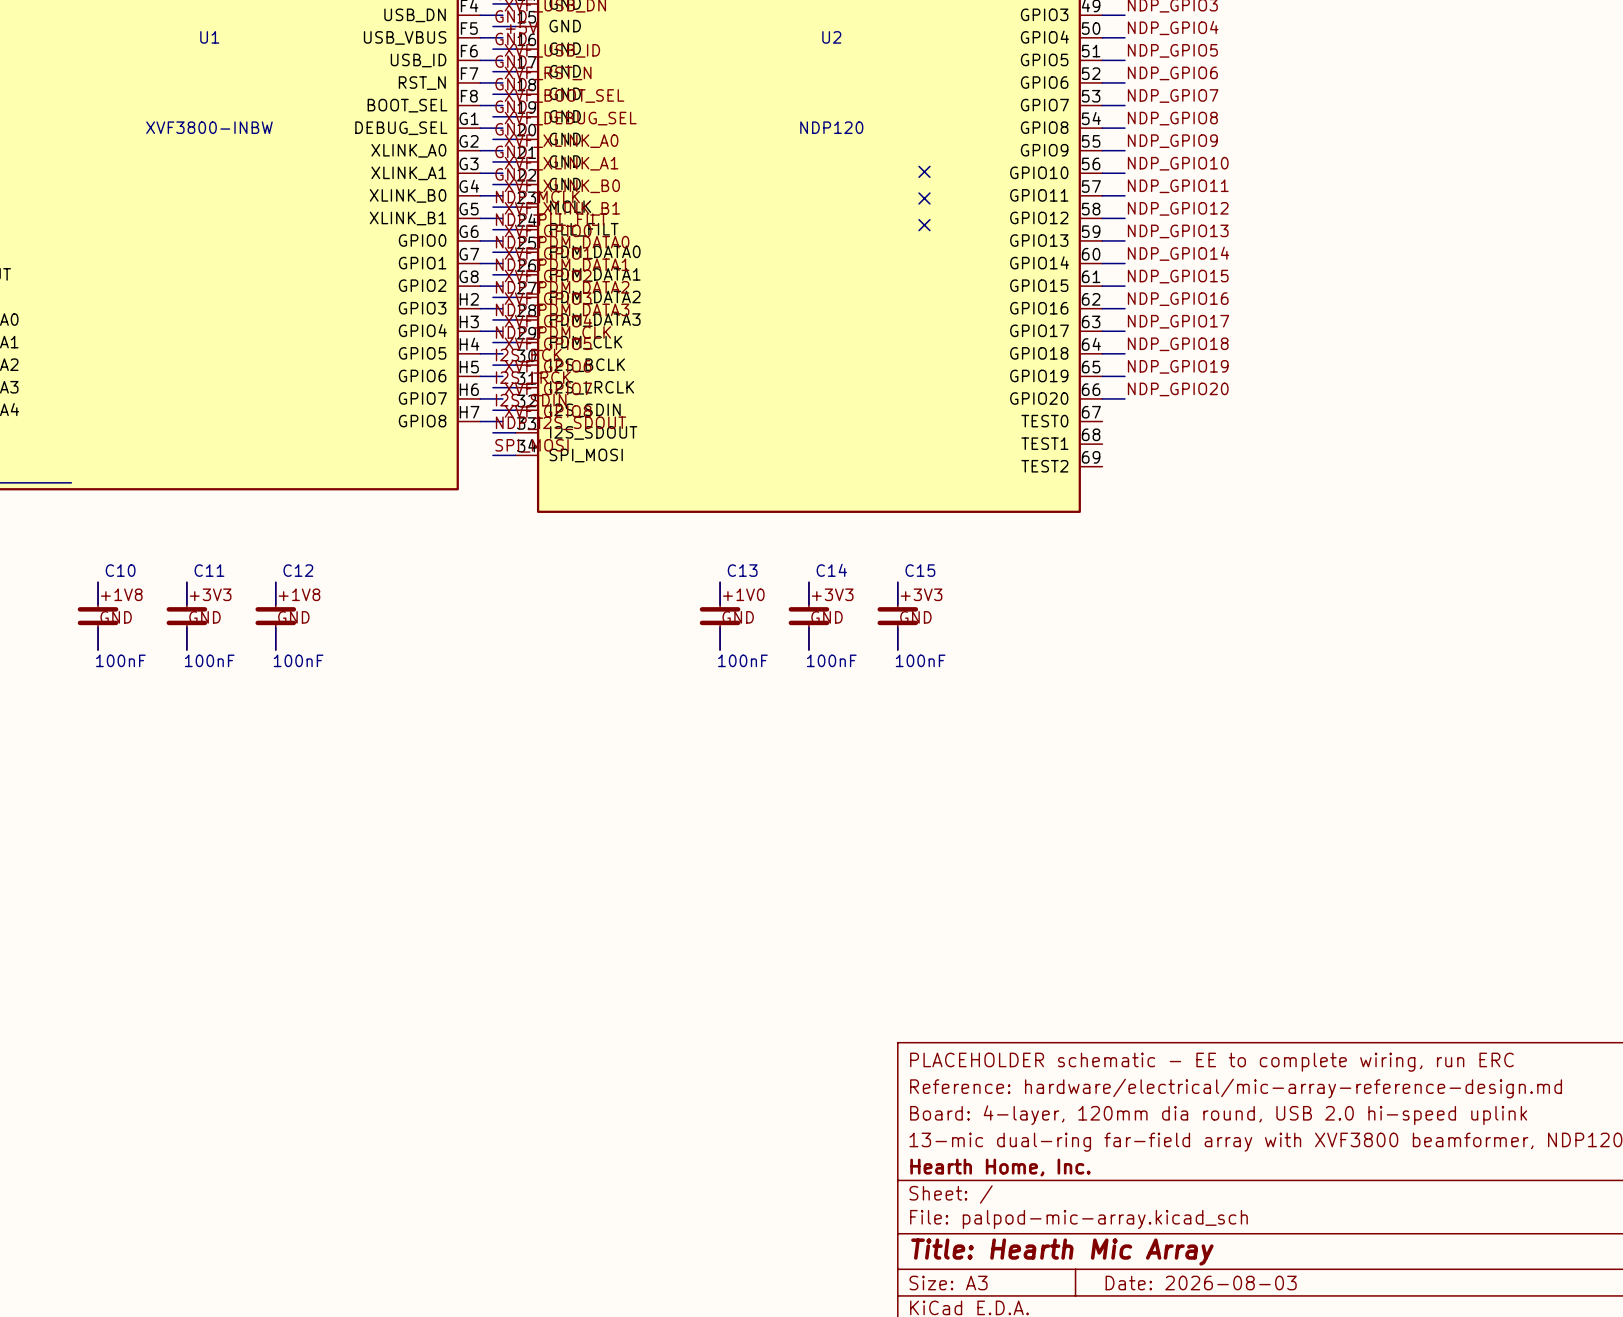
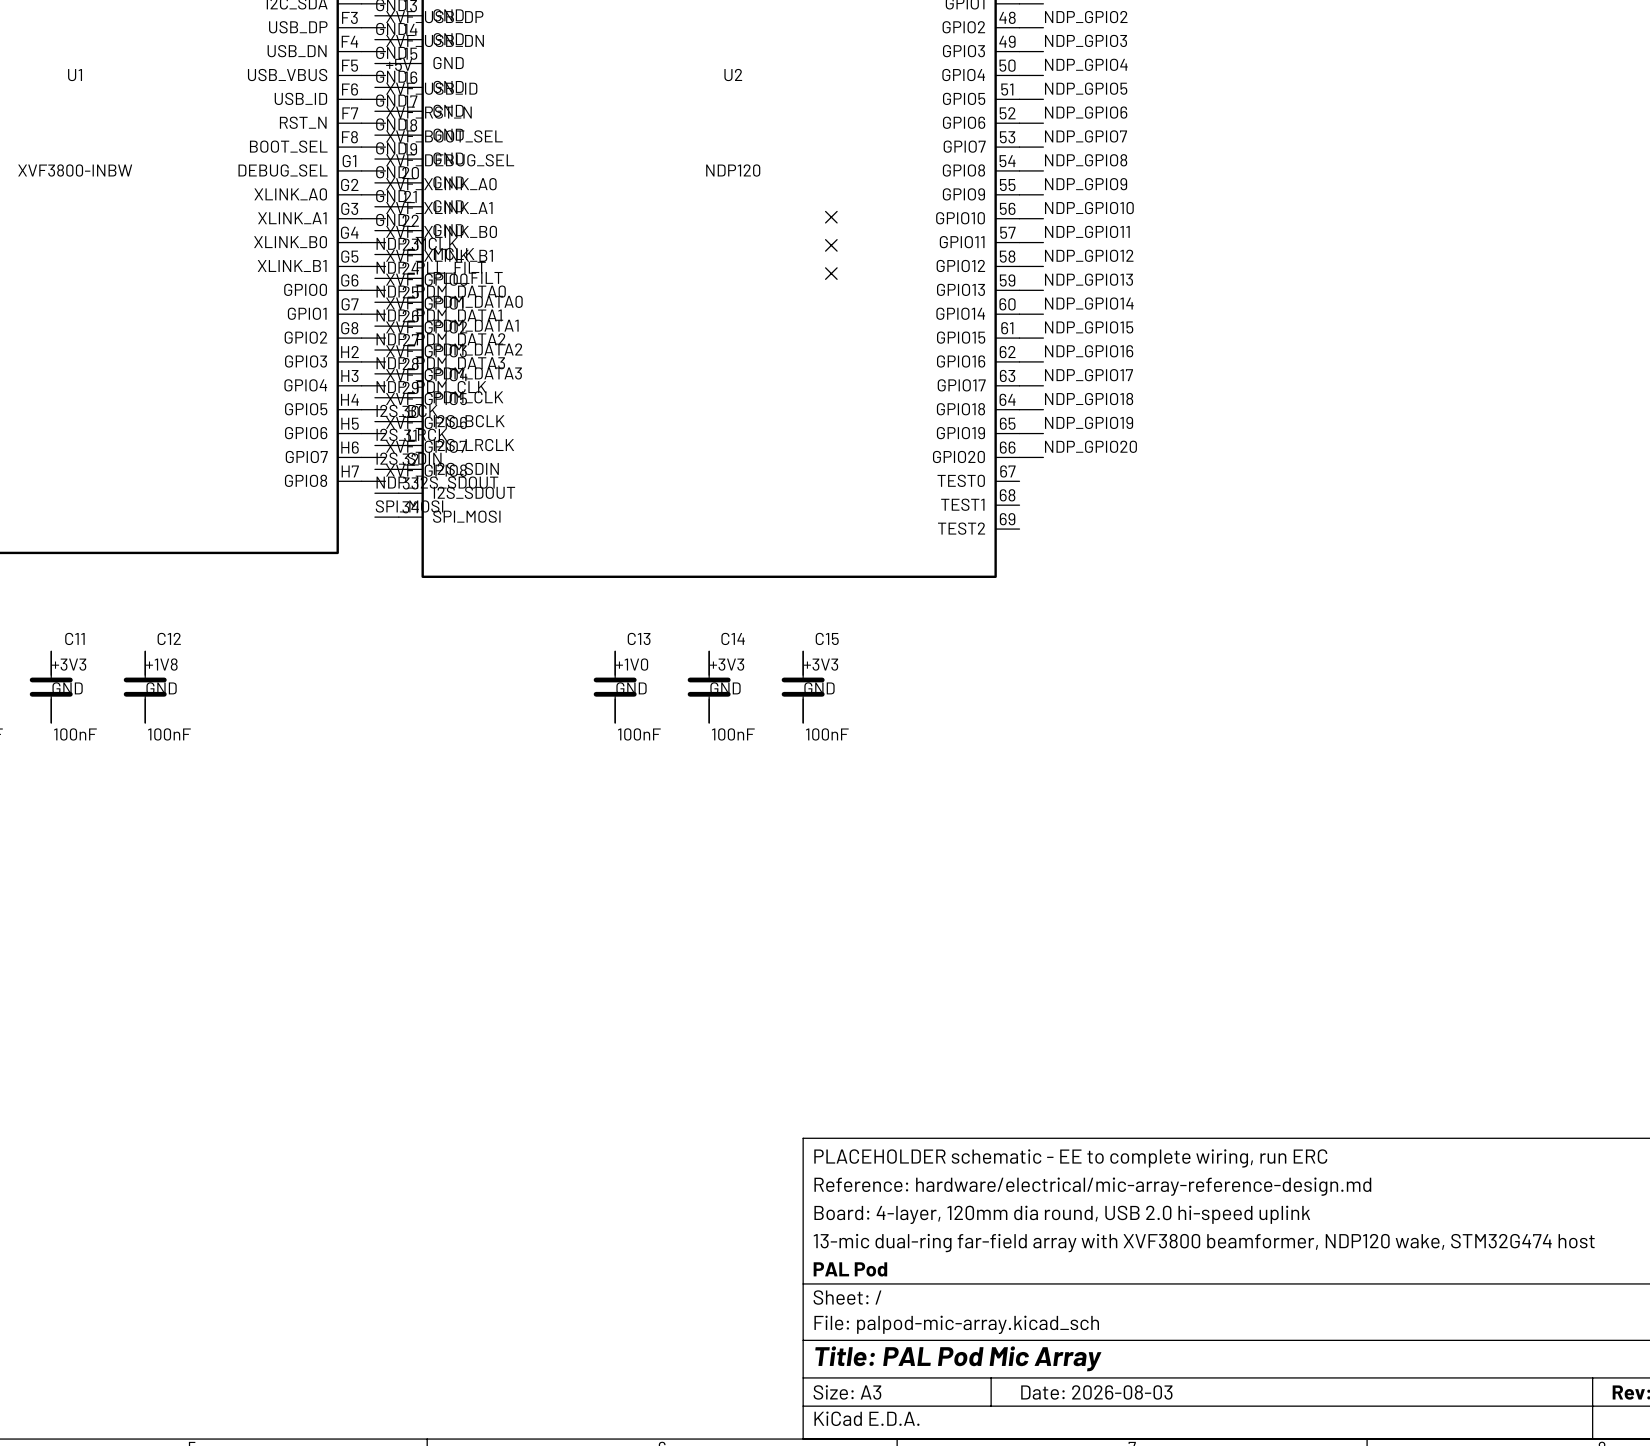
title block: Hearth Home, Inc. (1000, 1167) -> PAL Pod (850, 1269)
title block: Title: Hearth Mic Array (1062, 1252) -> Title: PAL Pod Mic Array (958, 1358)

